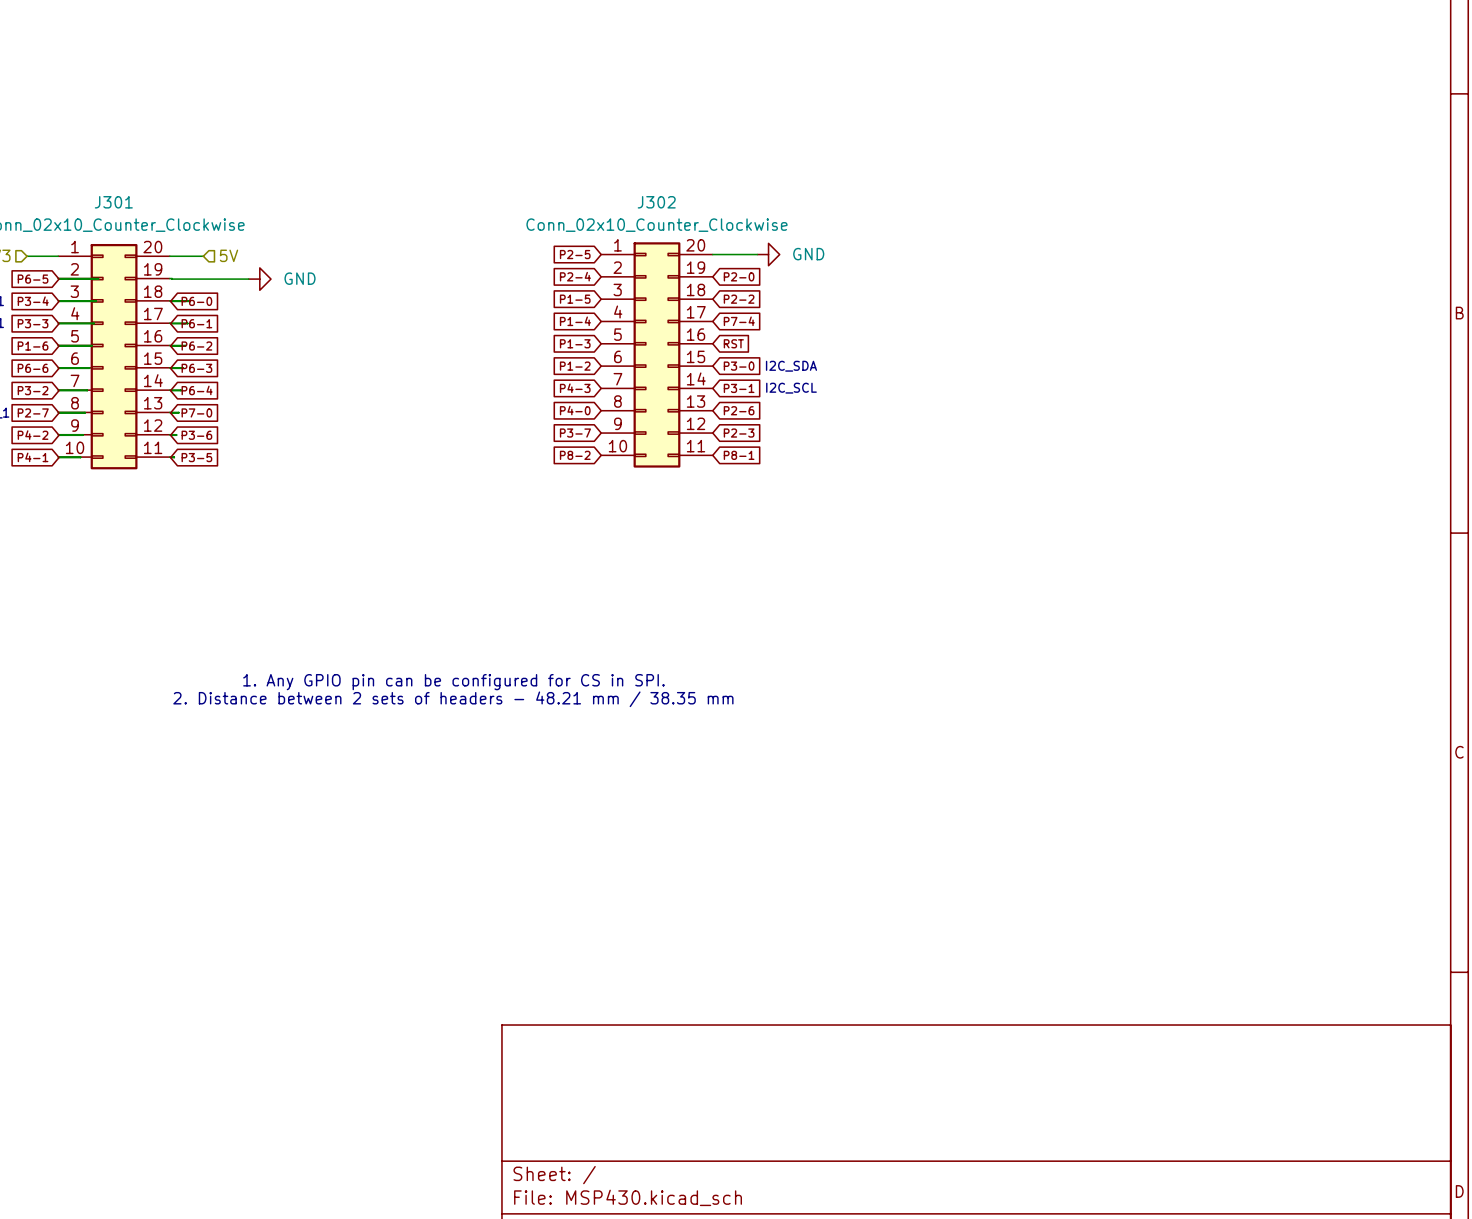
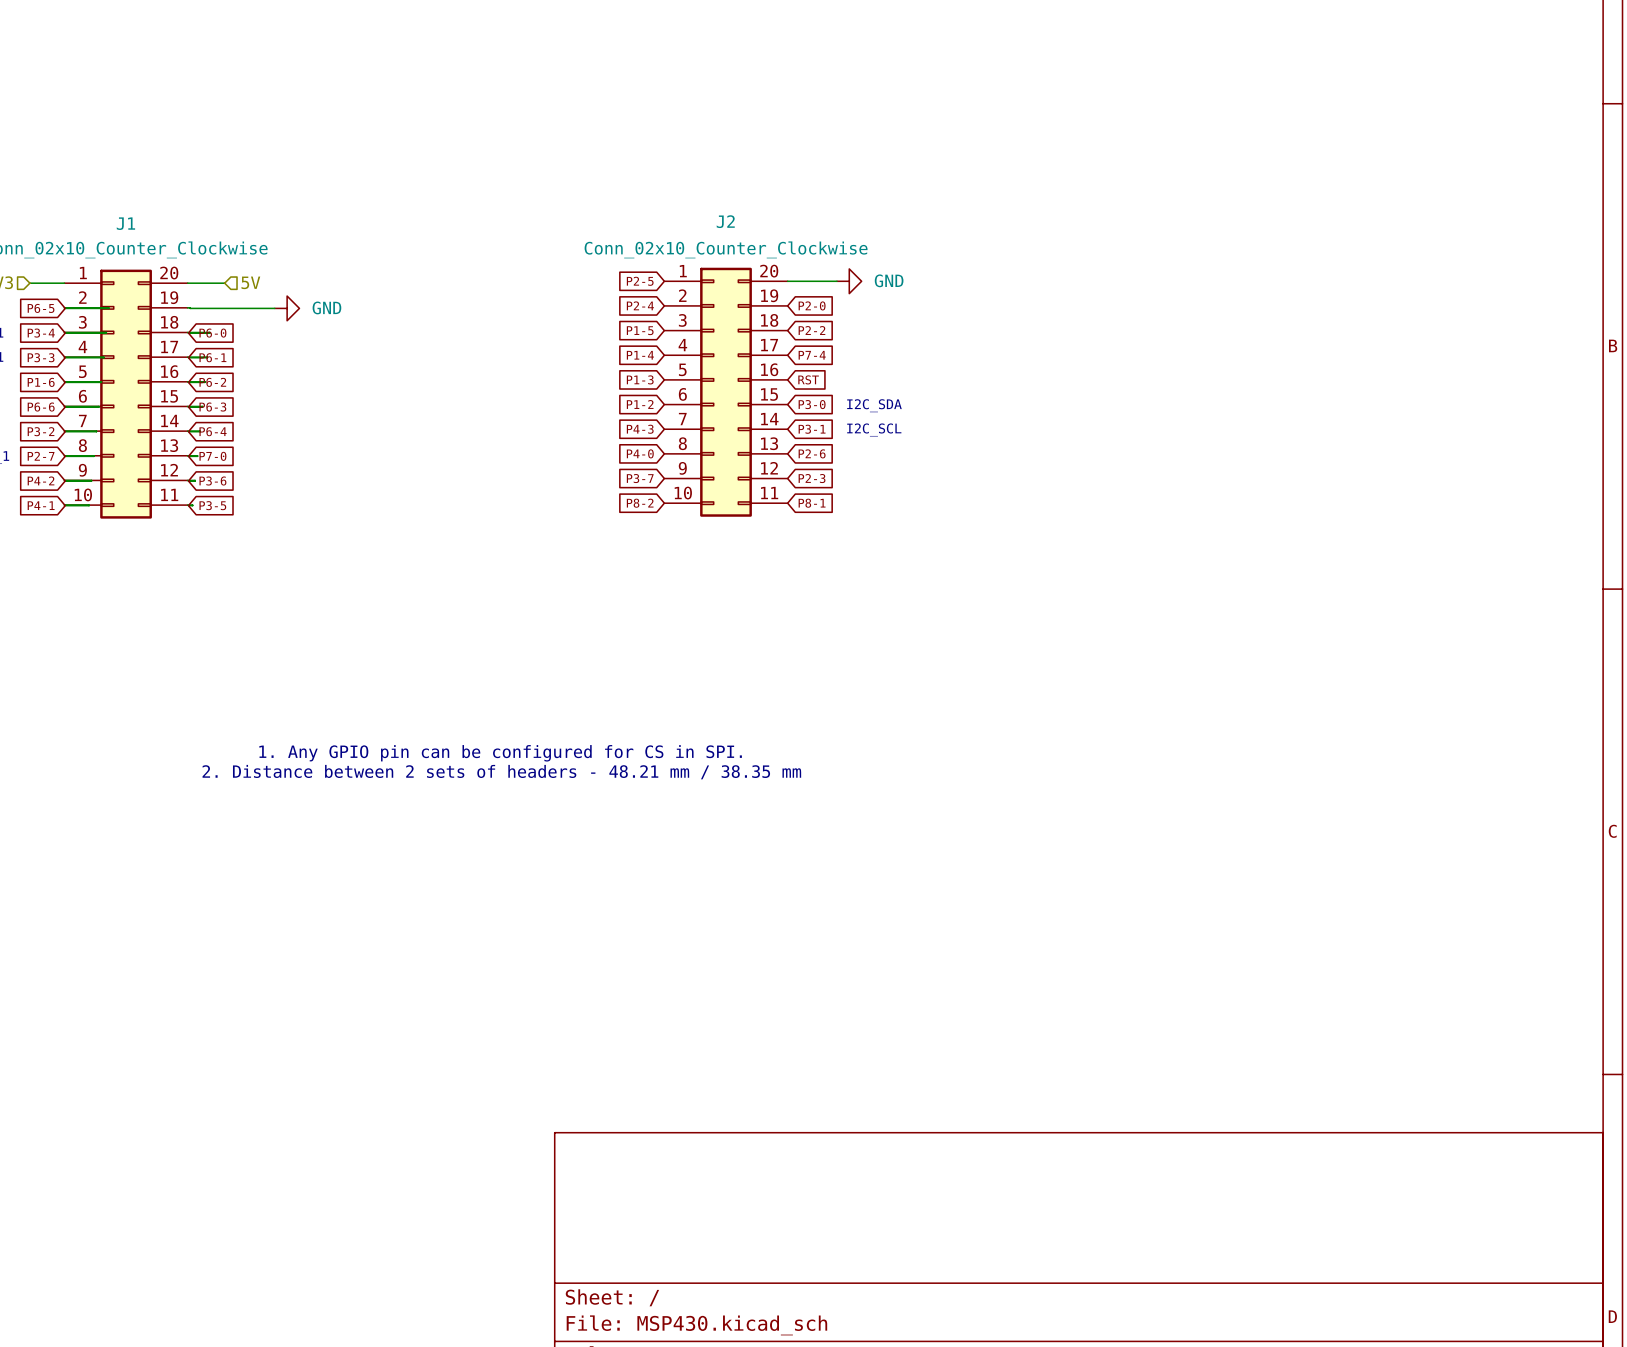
J301 name: J301 (113, 202) -> J1 (125, 223)
J302 name: J302 (656, 202) -> J2 (725, 221)

